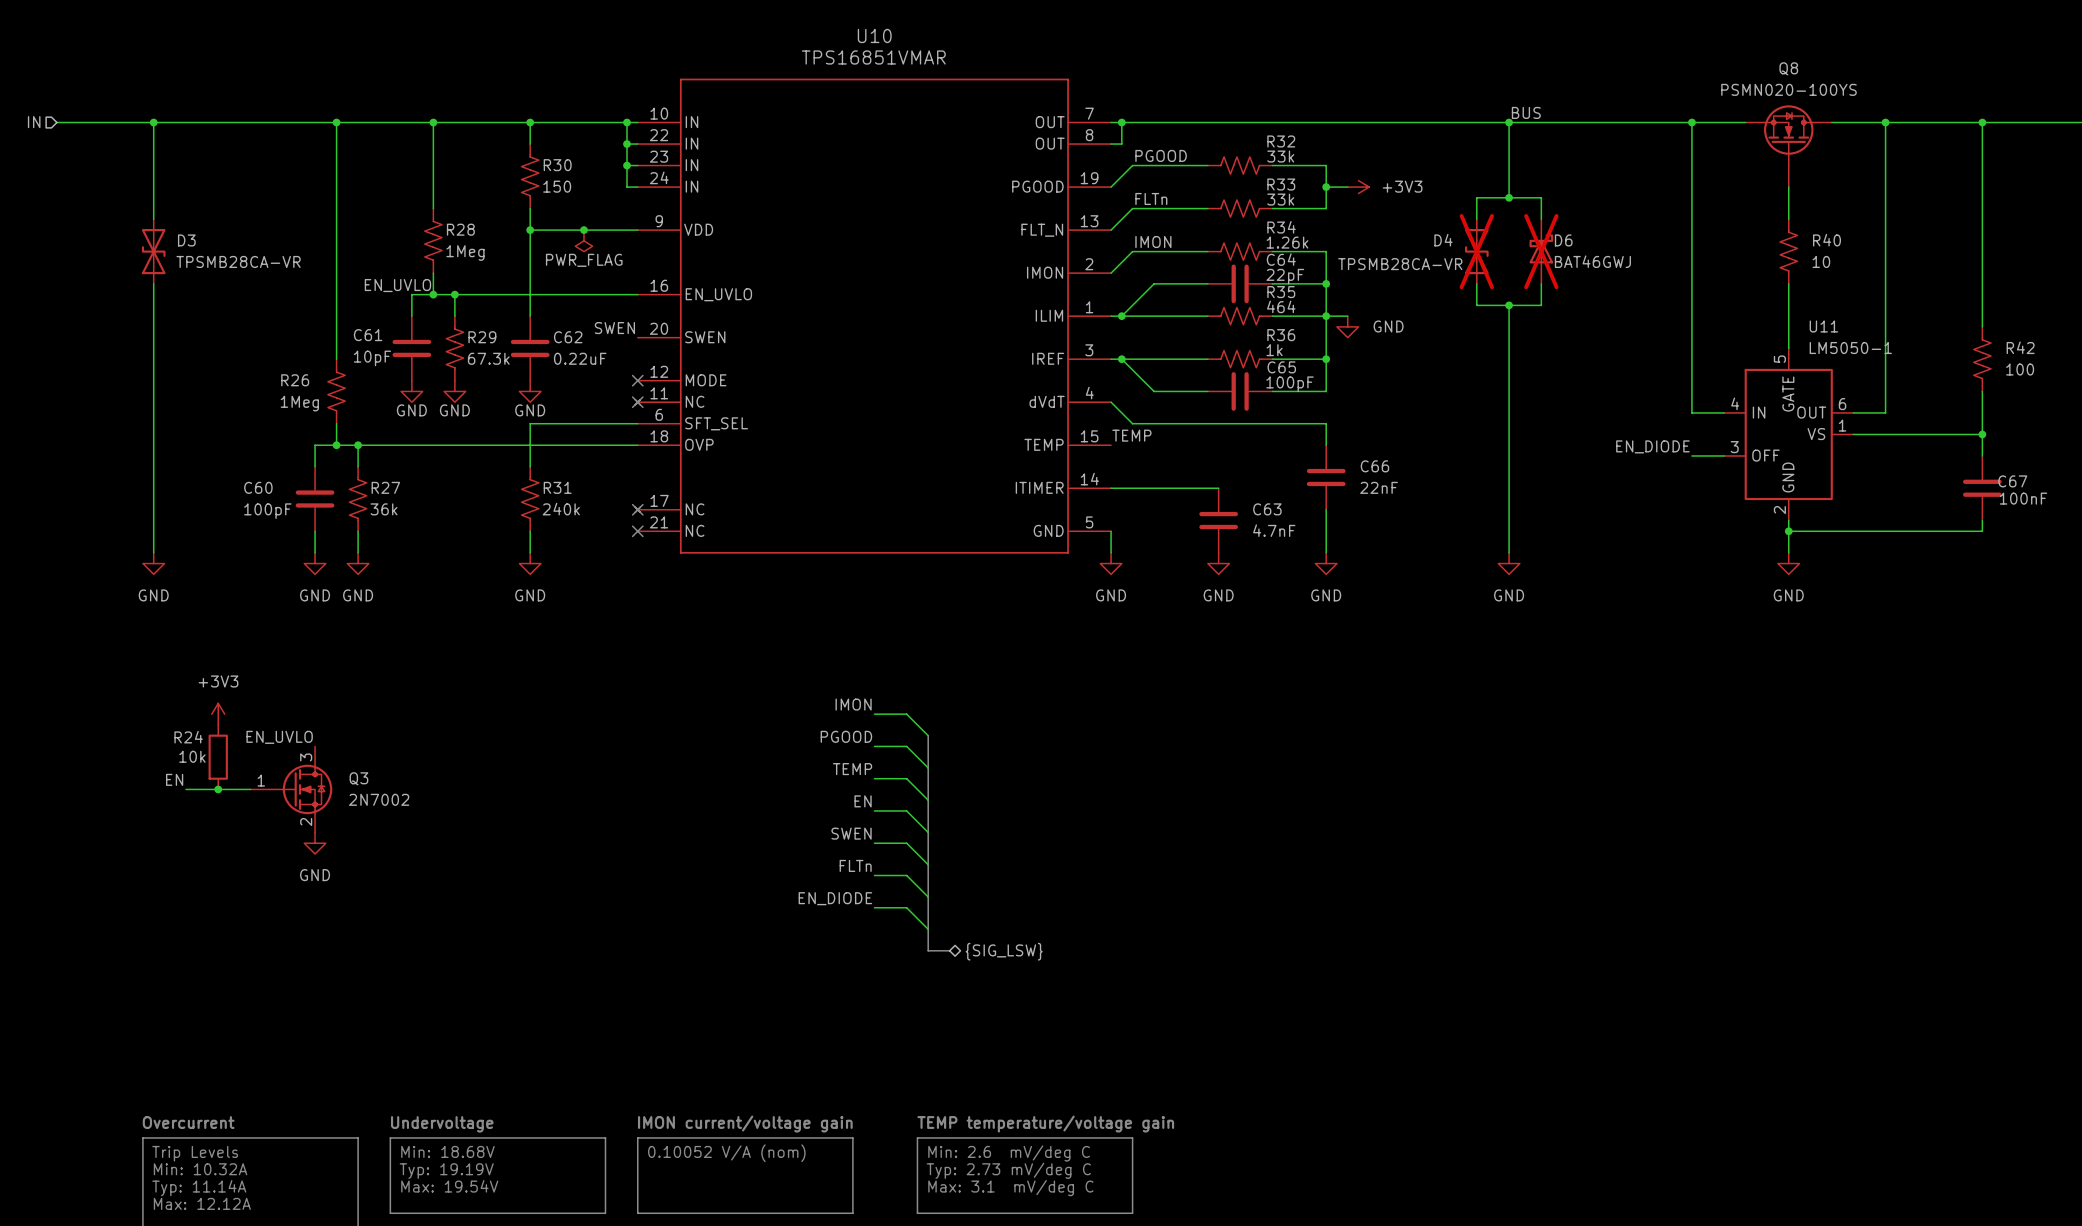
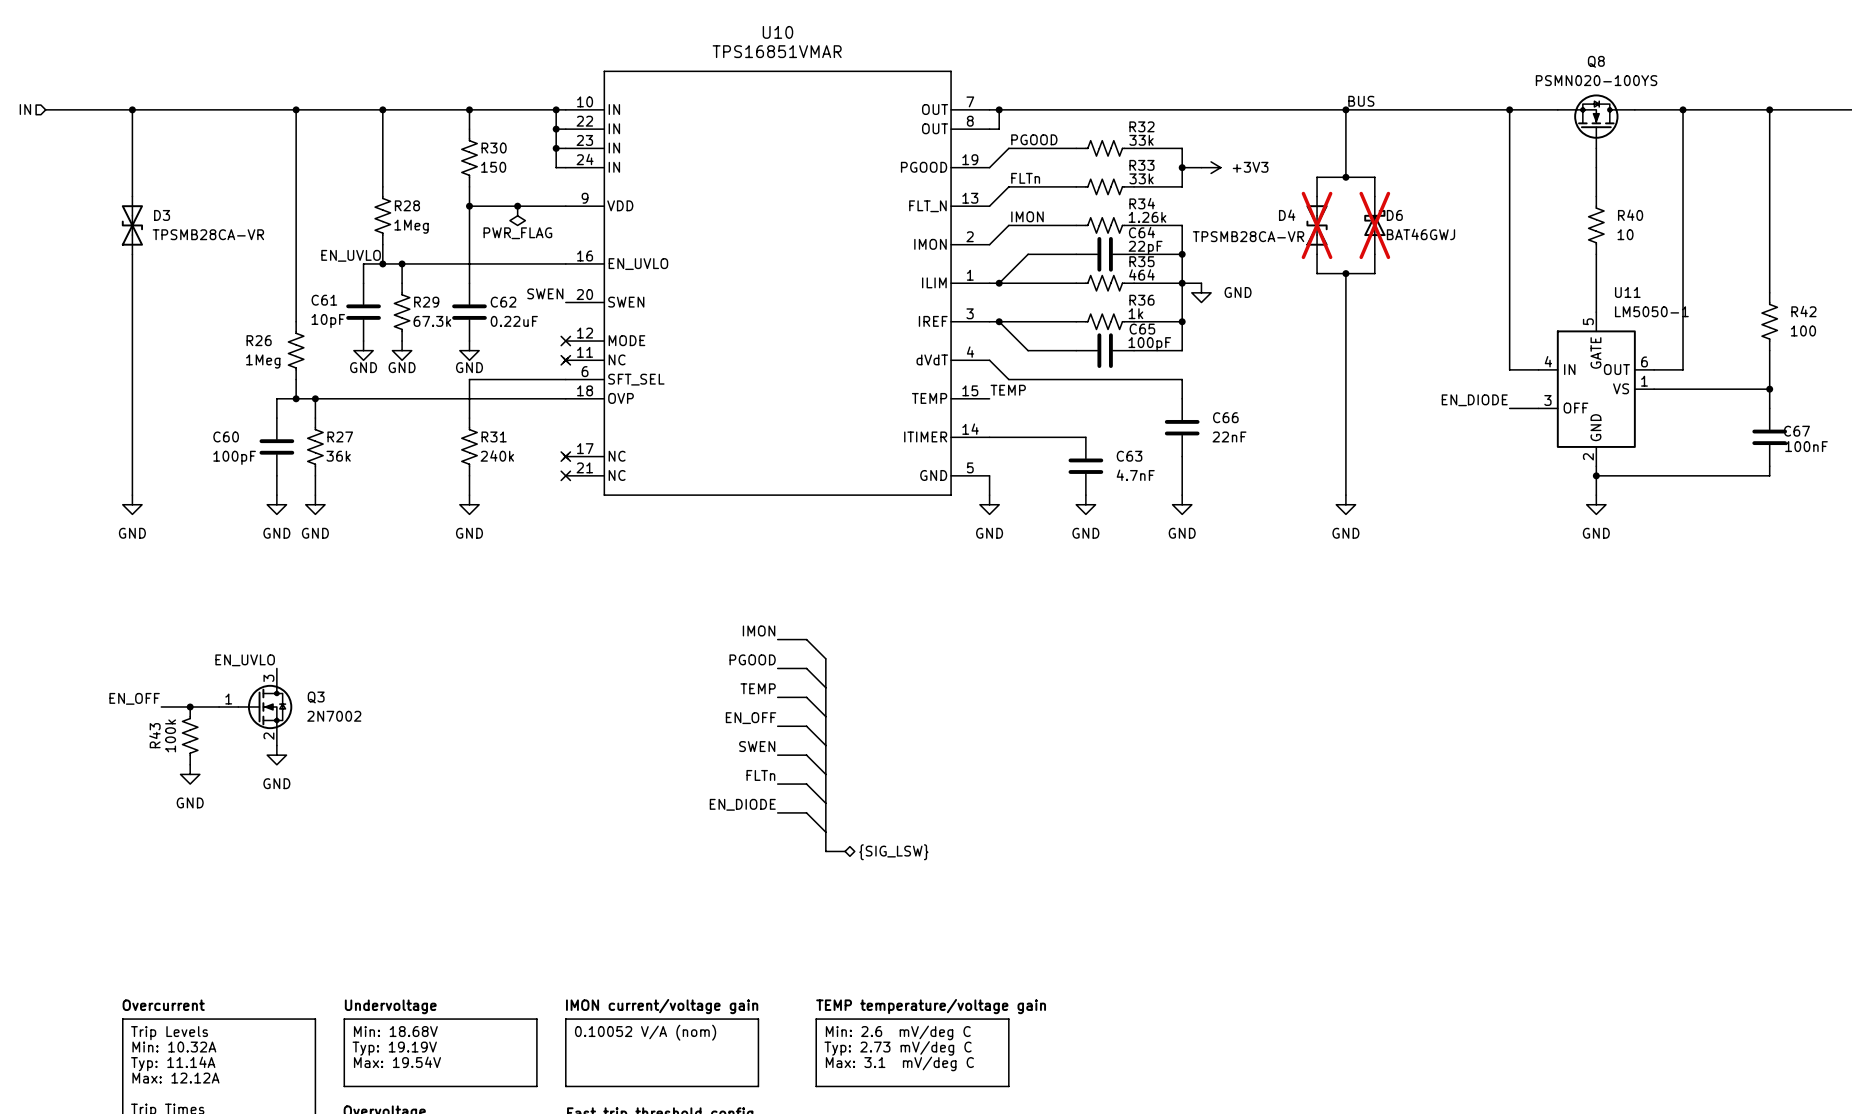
power symbol: +3V3 (218, 714) -> none
R24: 10k (218, 757) -> none
label: EN (174, 779) -> EN_OFF (134, 698)
label: EN (863, 801) -> EN_OFF (751, 718)
R43: none -> 100k (190, 735)
power symbol: none -> GND (190, 774)

